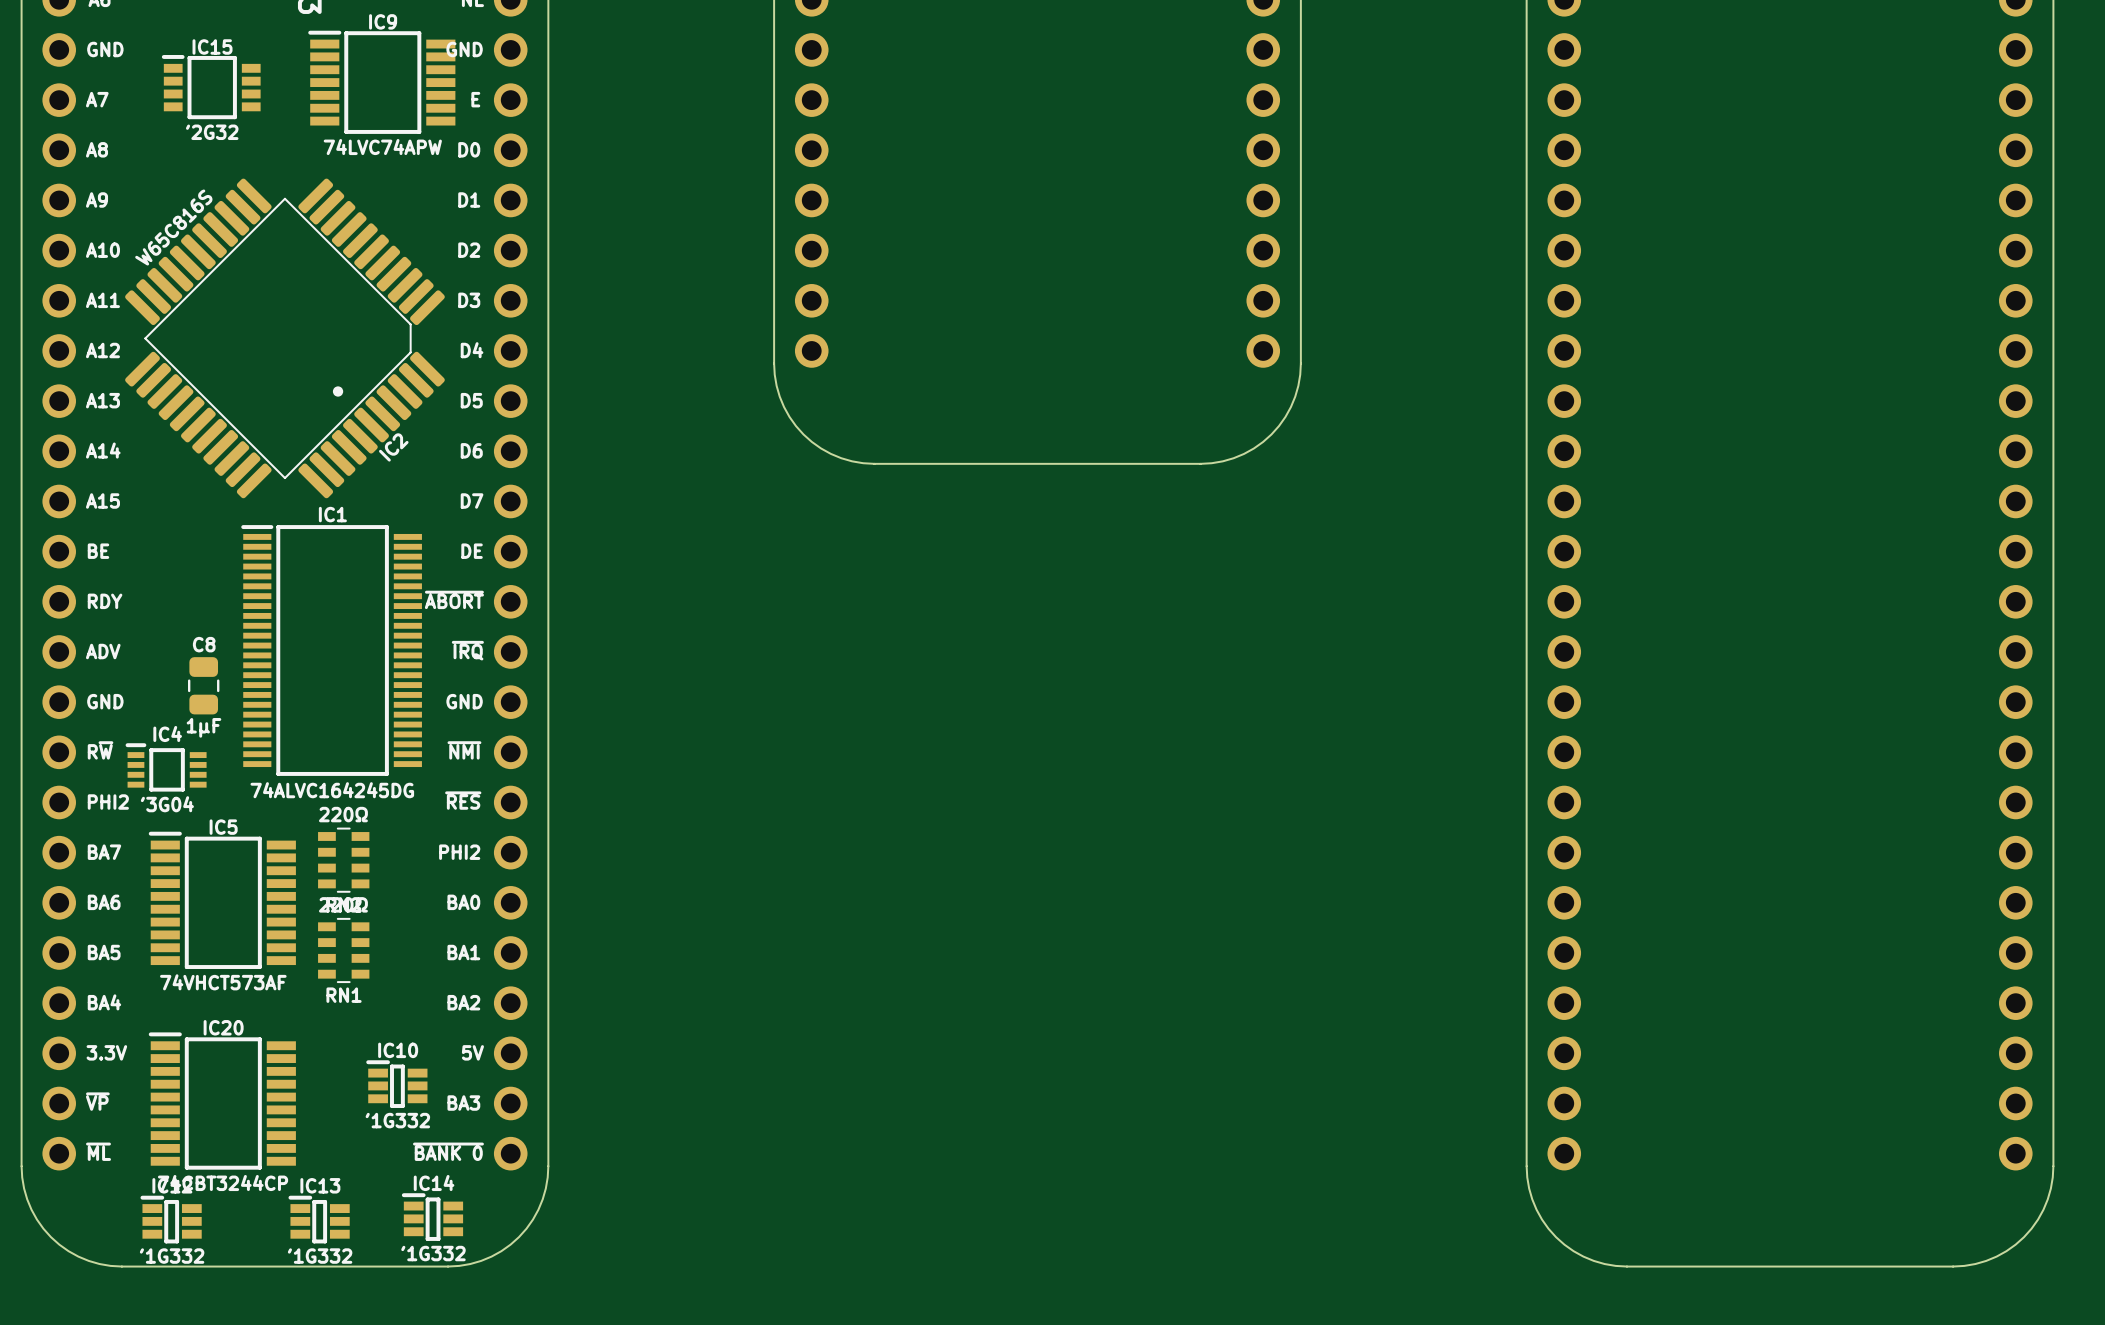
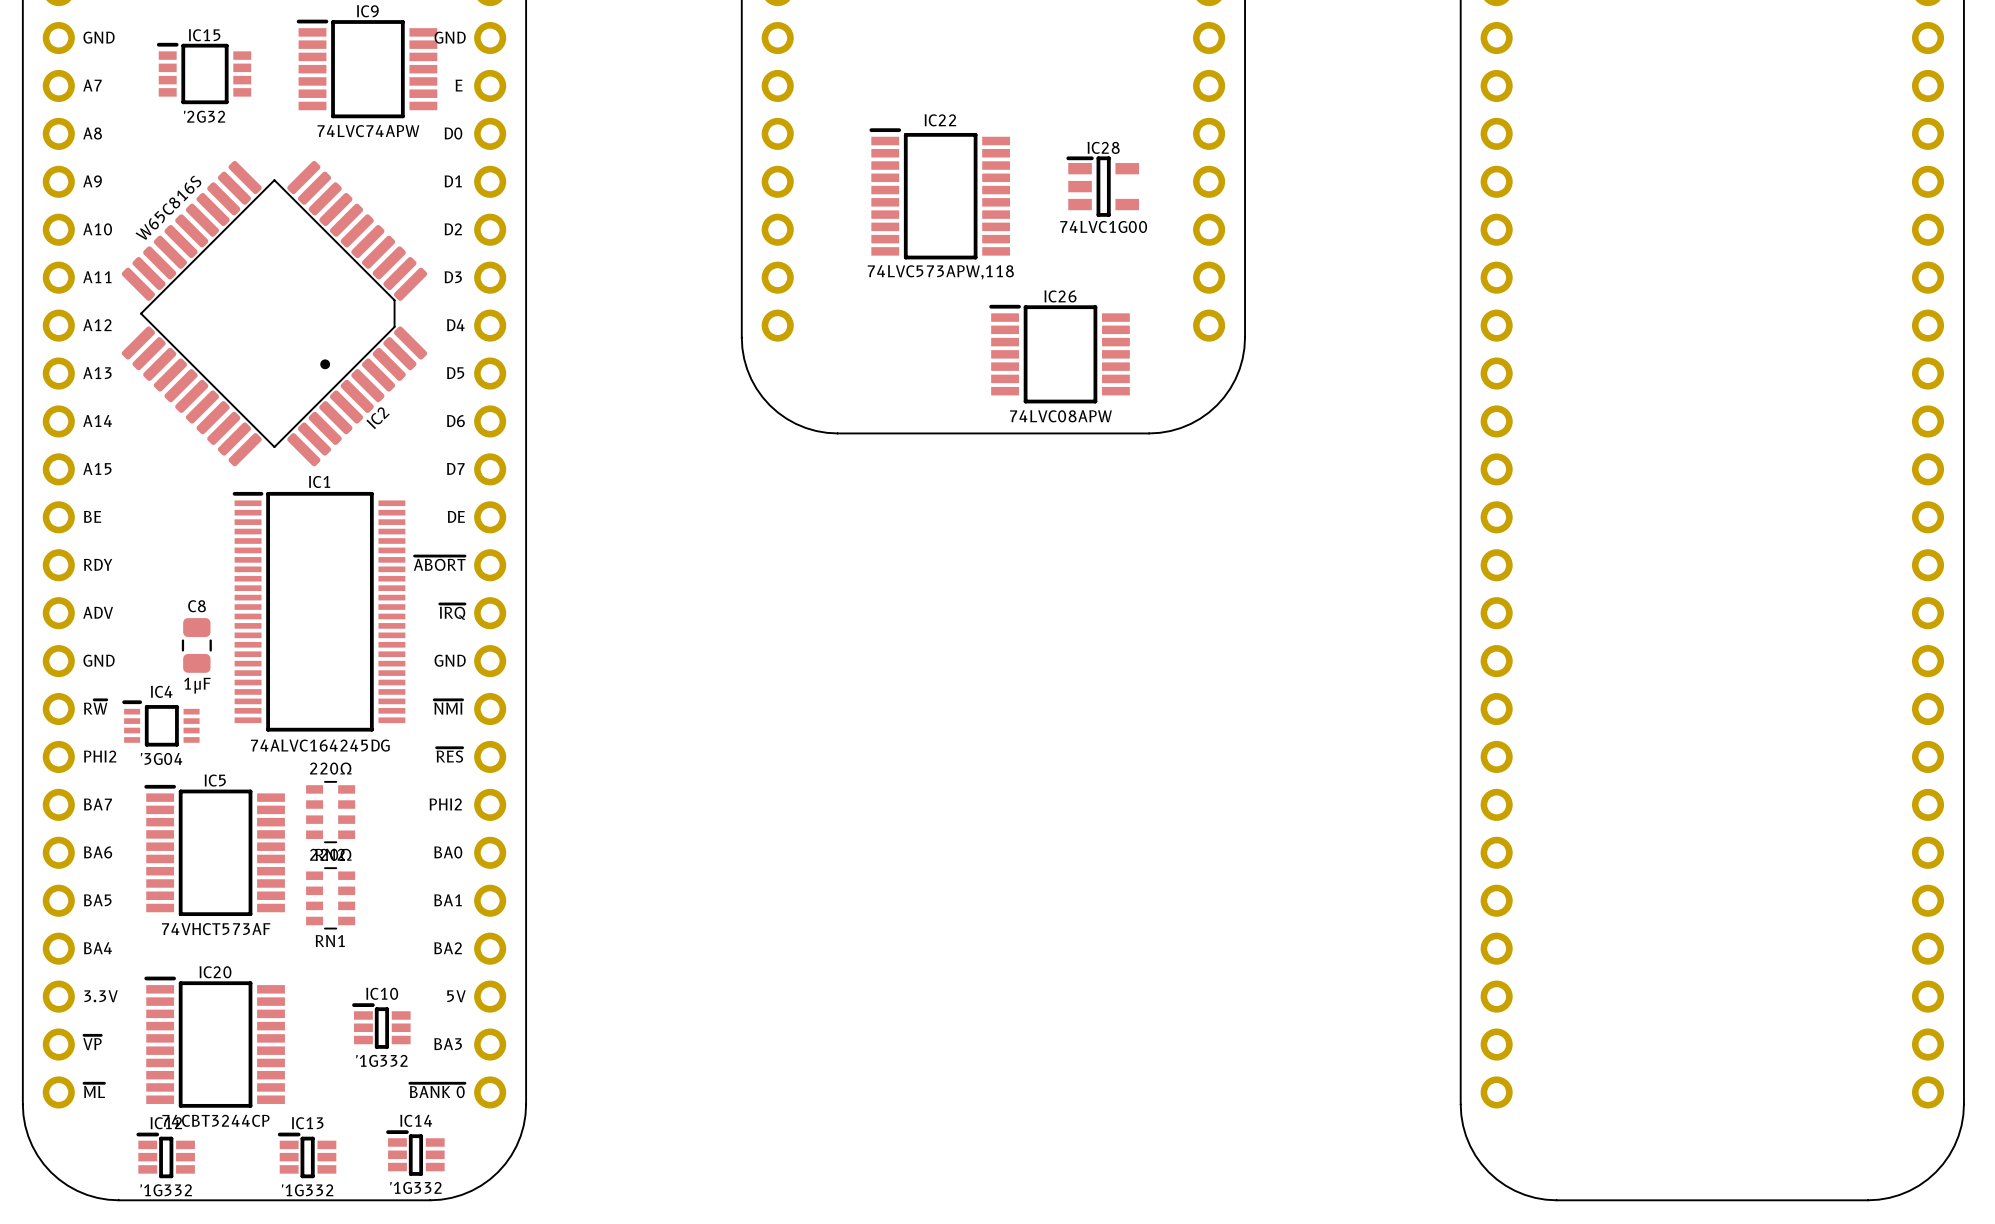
IC28: none -> (1102, 186)
IC22: none -> 74LVC573APW,118 (939, 193)
IC26: none -> (1059, 354)

